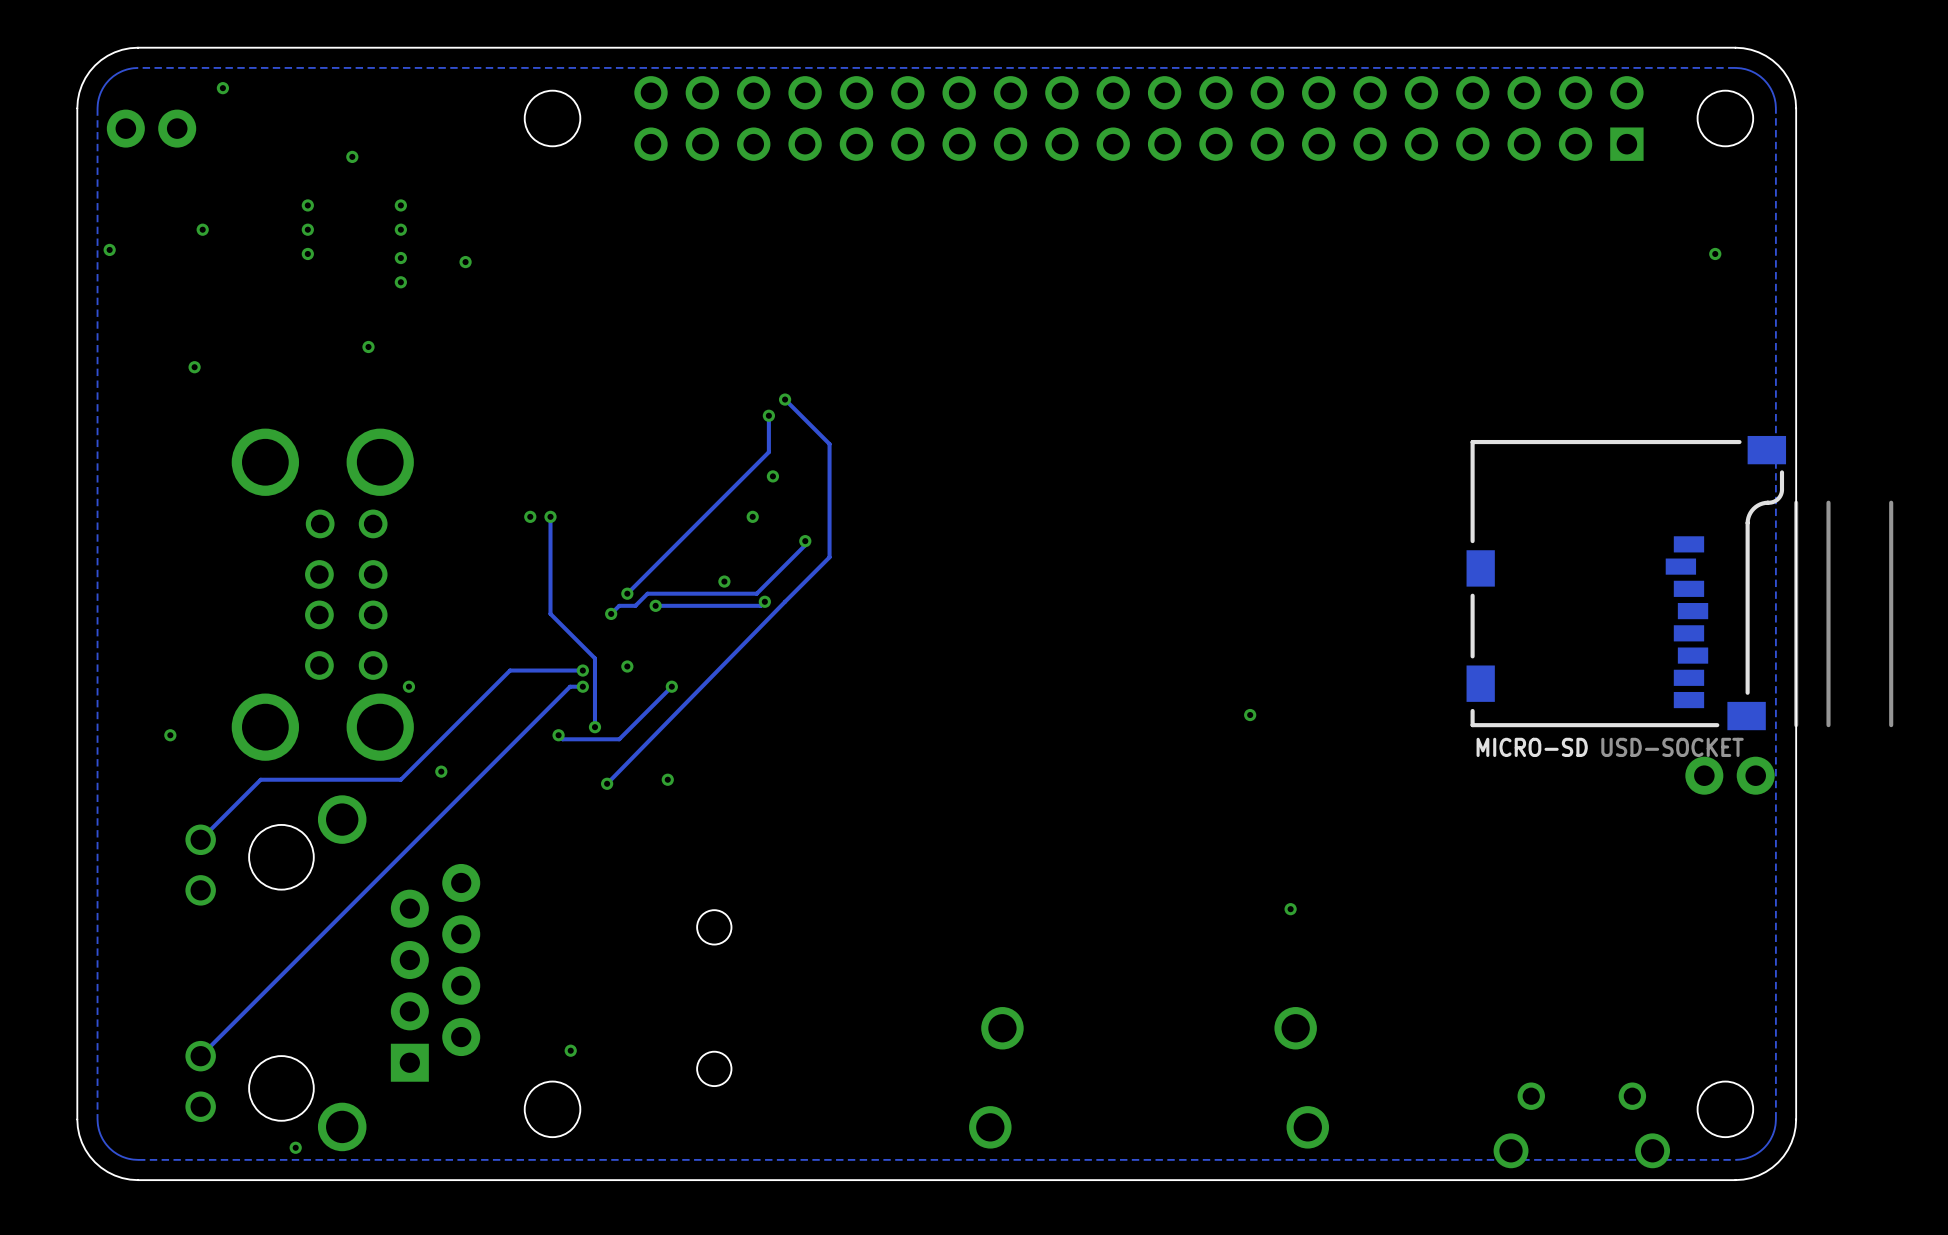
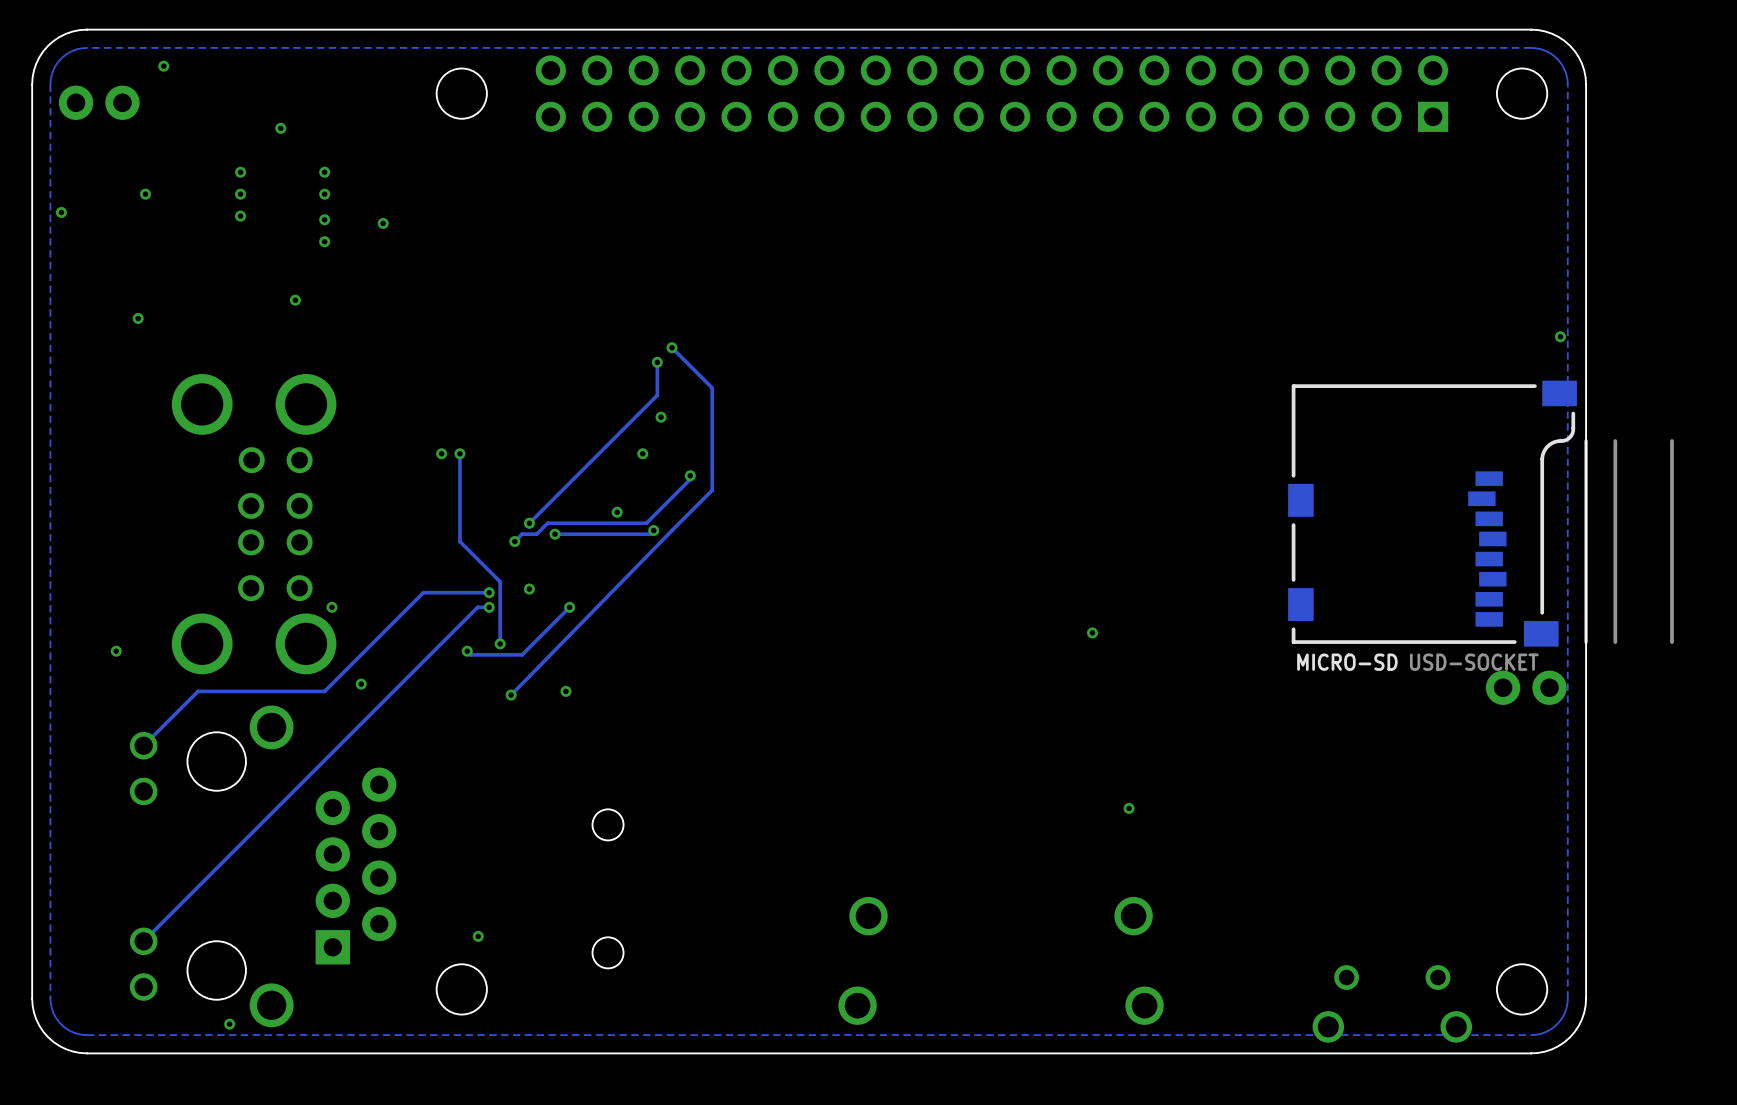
via: (1715, 253) -> none
via: none -> (1560, 336)

